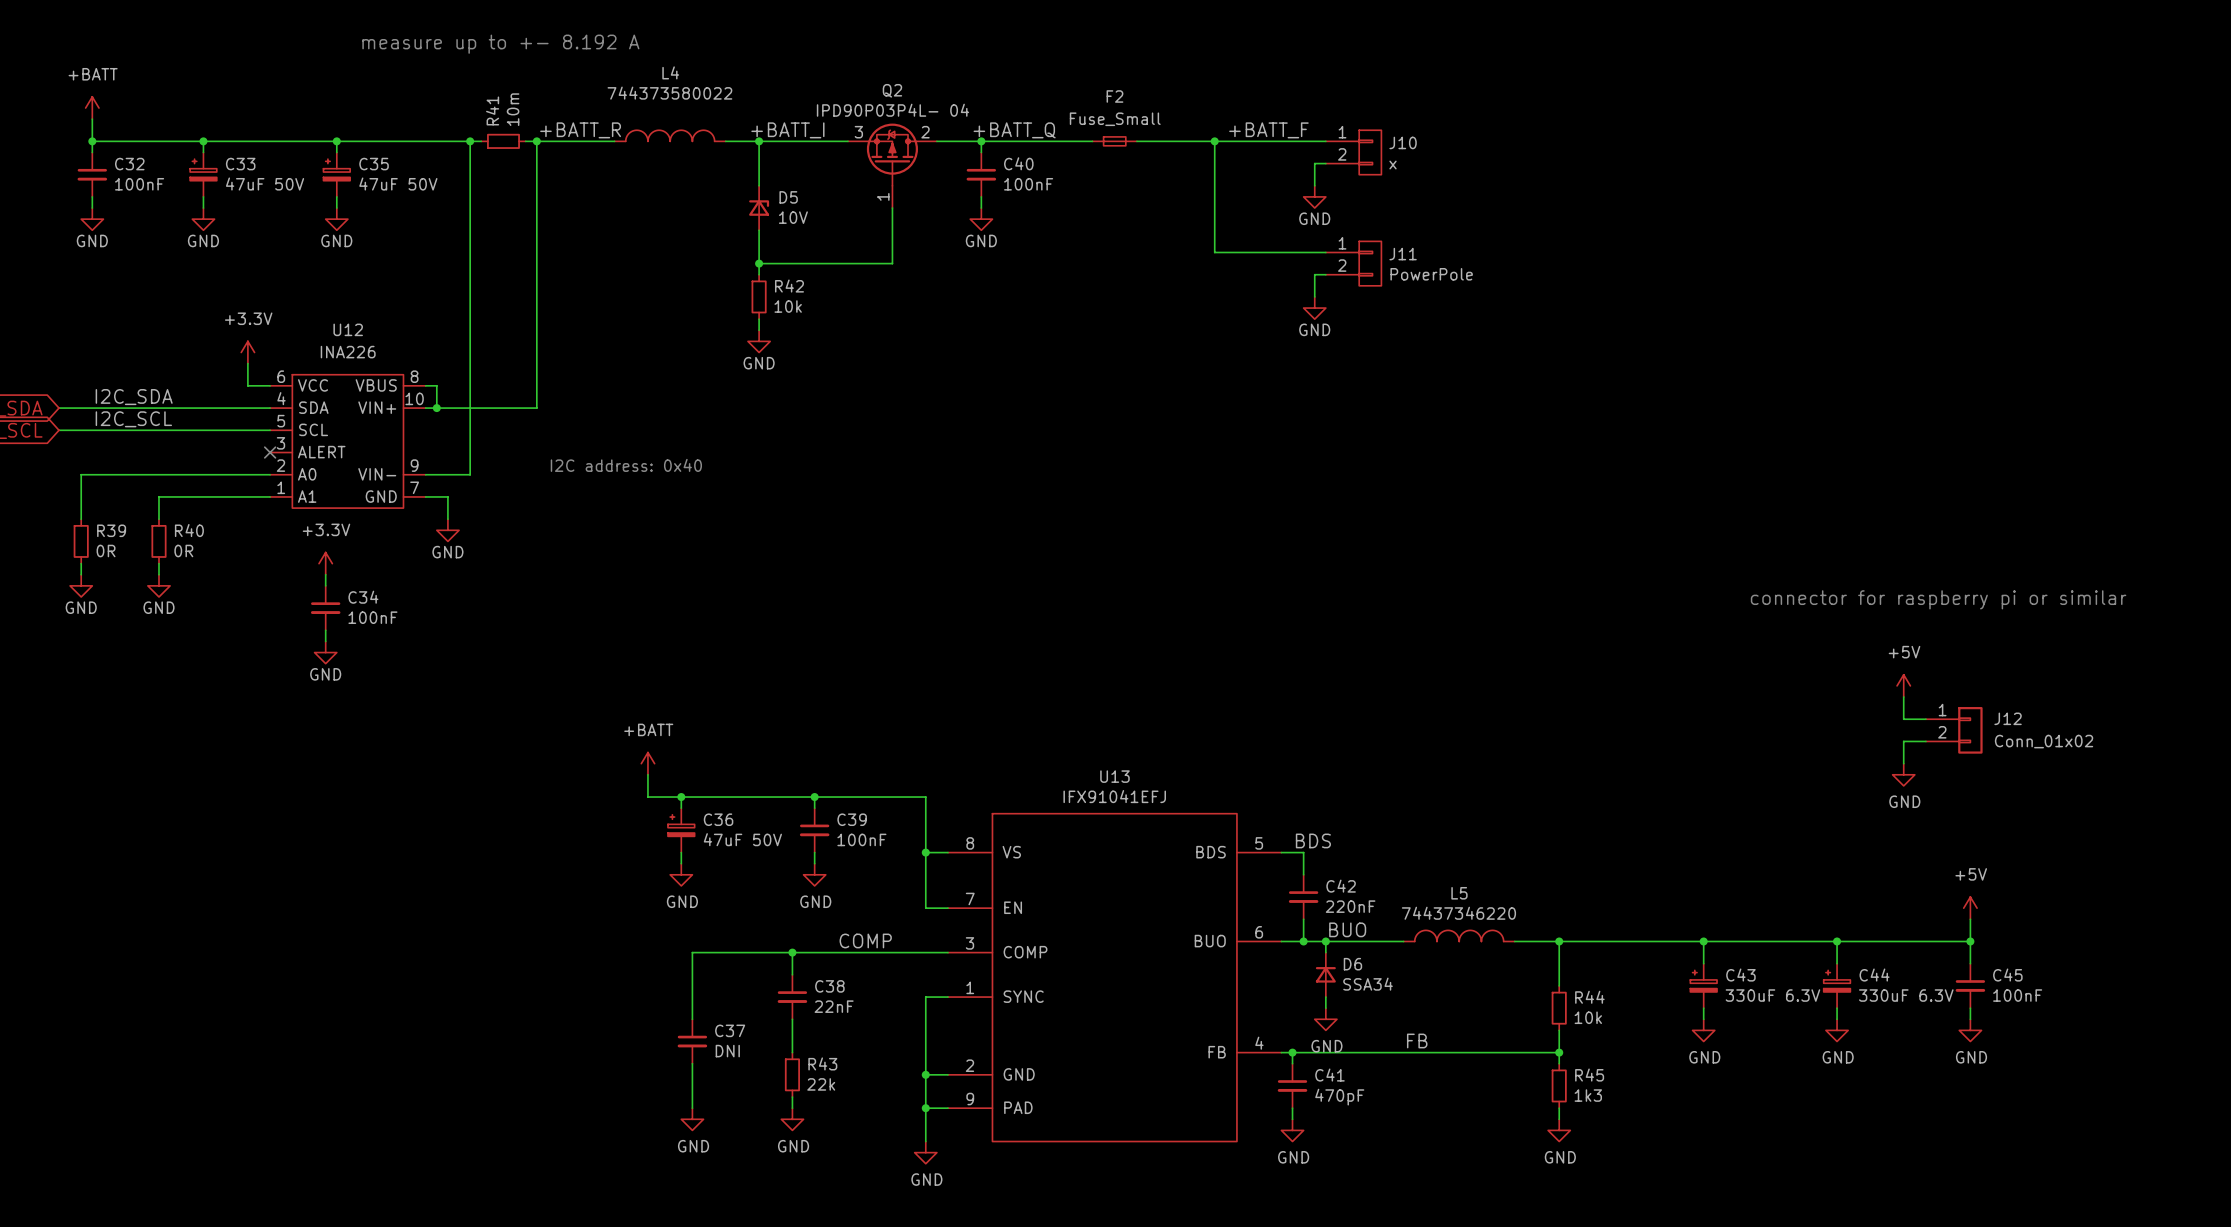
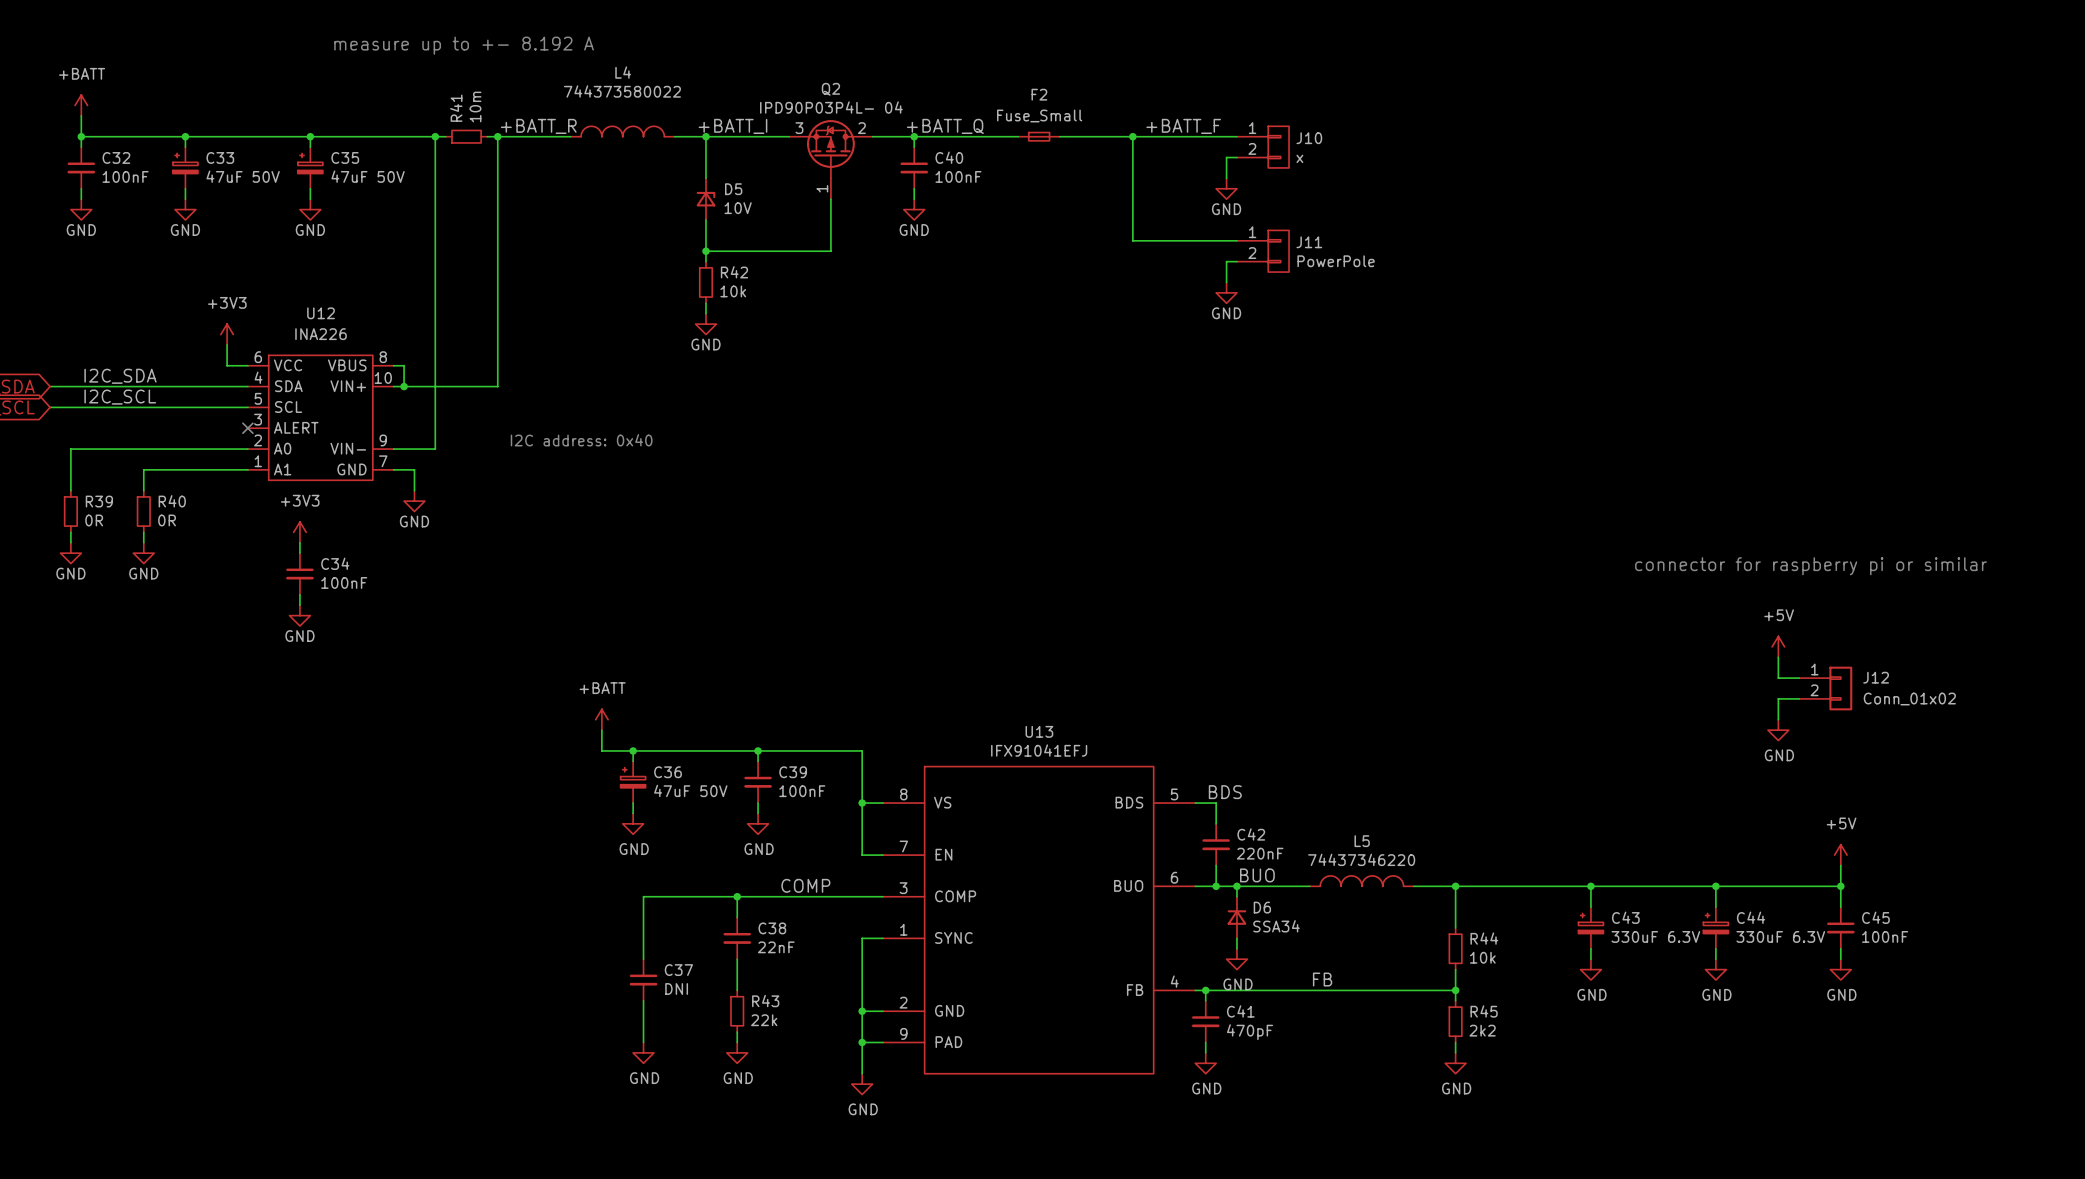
power symbol: +3.3V (247, 352) -> +3V3 (227, 334)
power symbol: +3.3V (325, 563) -> +3V3 (299, 532)
R45 value: 1k3 (1588, 1095) -> 2k2 (1482, 1030)

